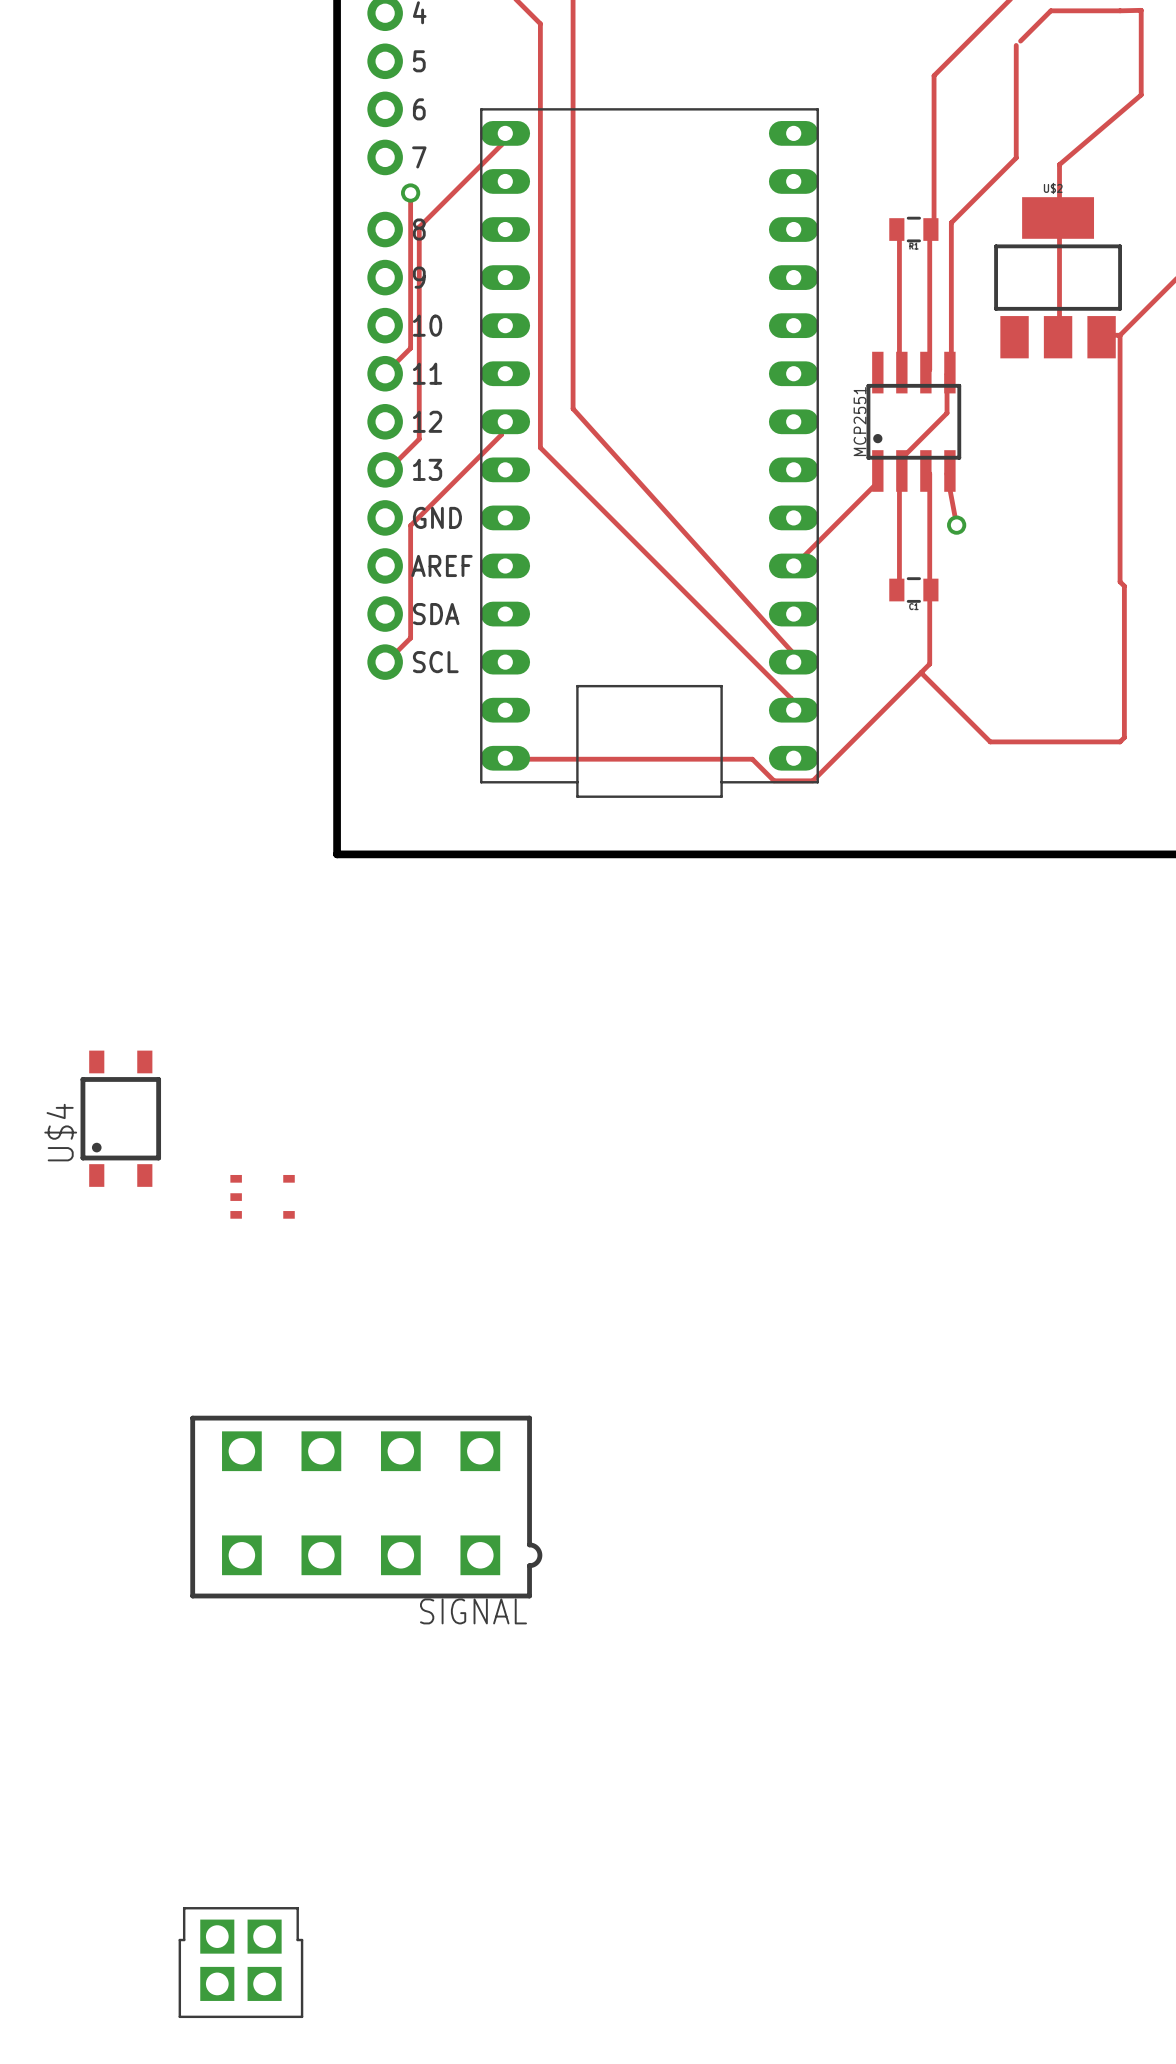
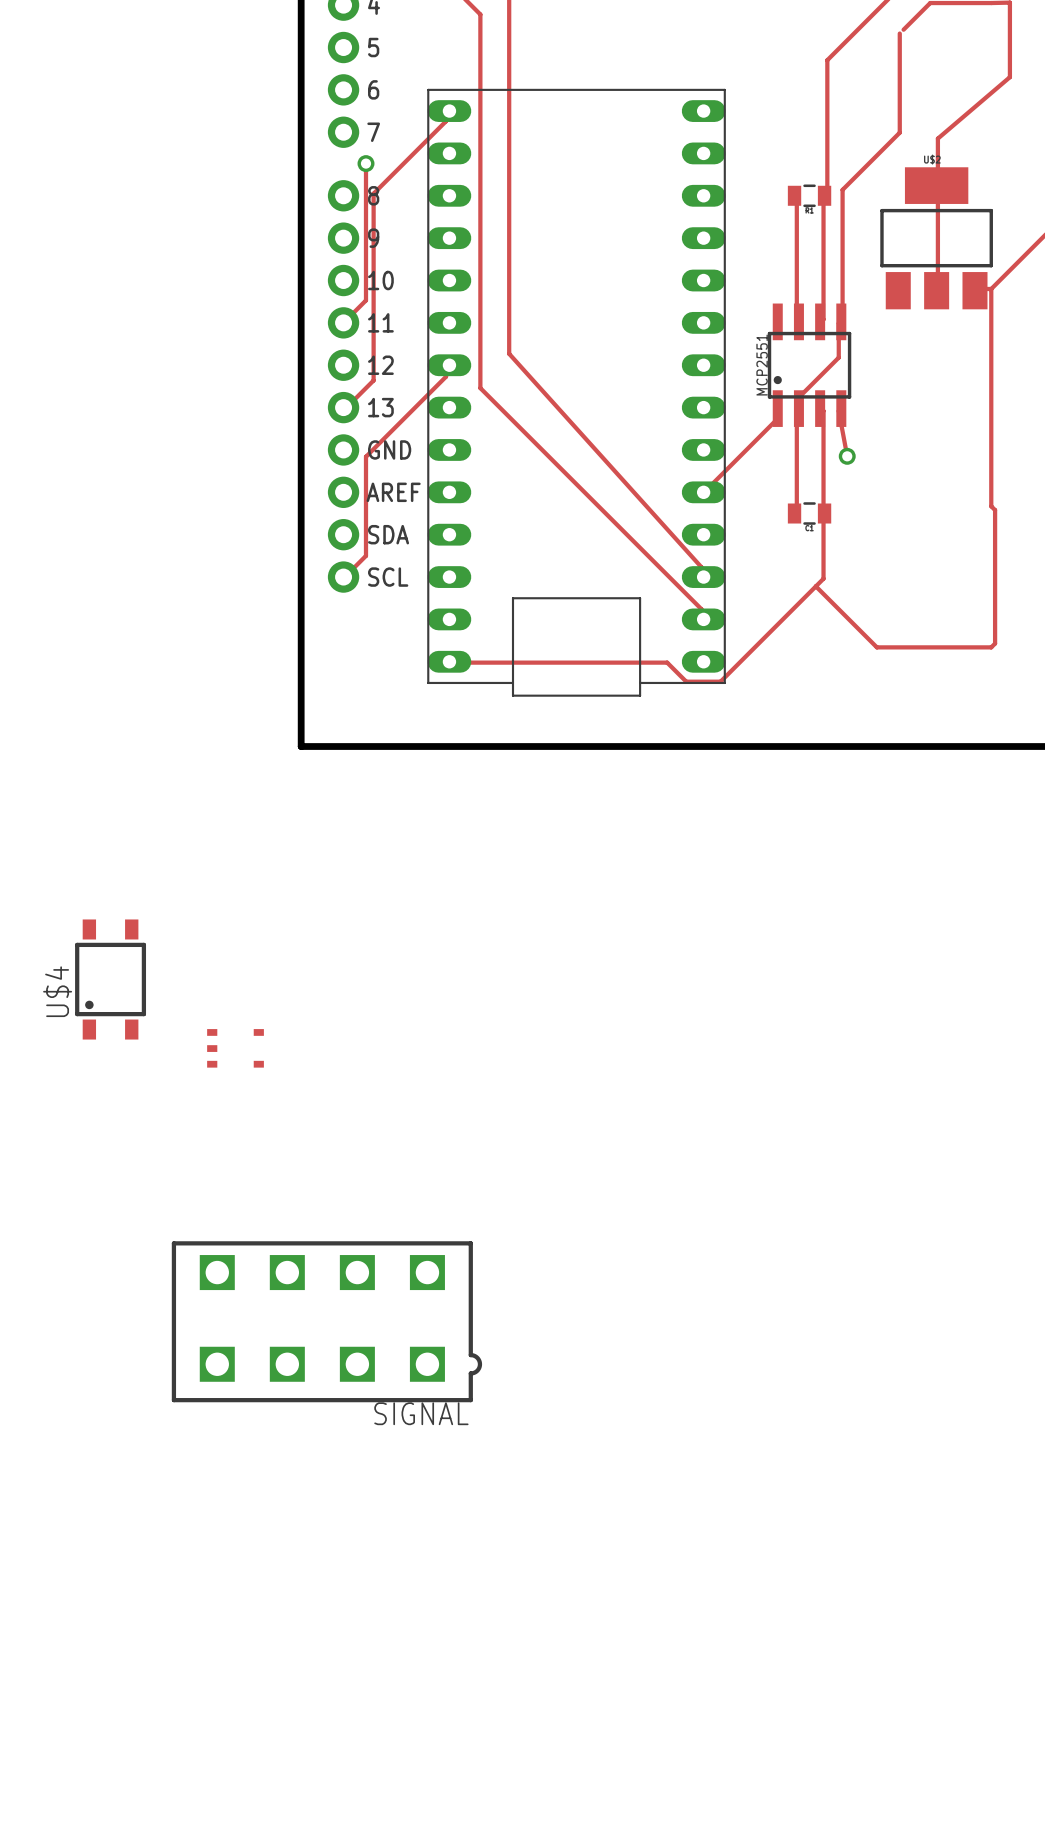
part: (240, 1962) -> none

